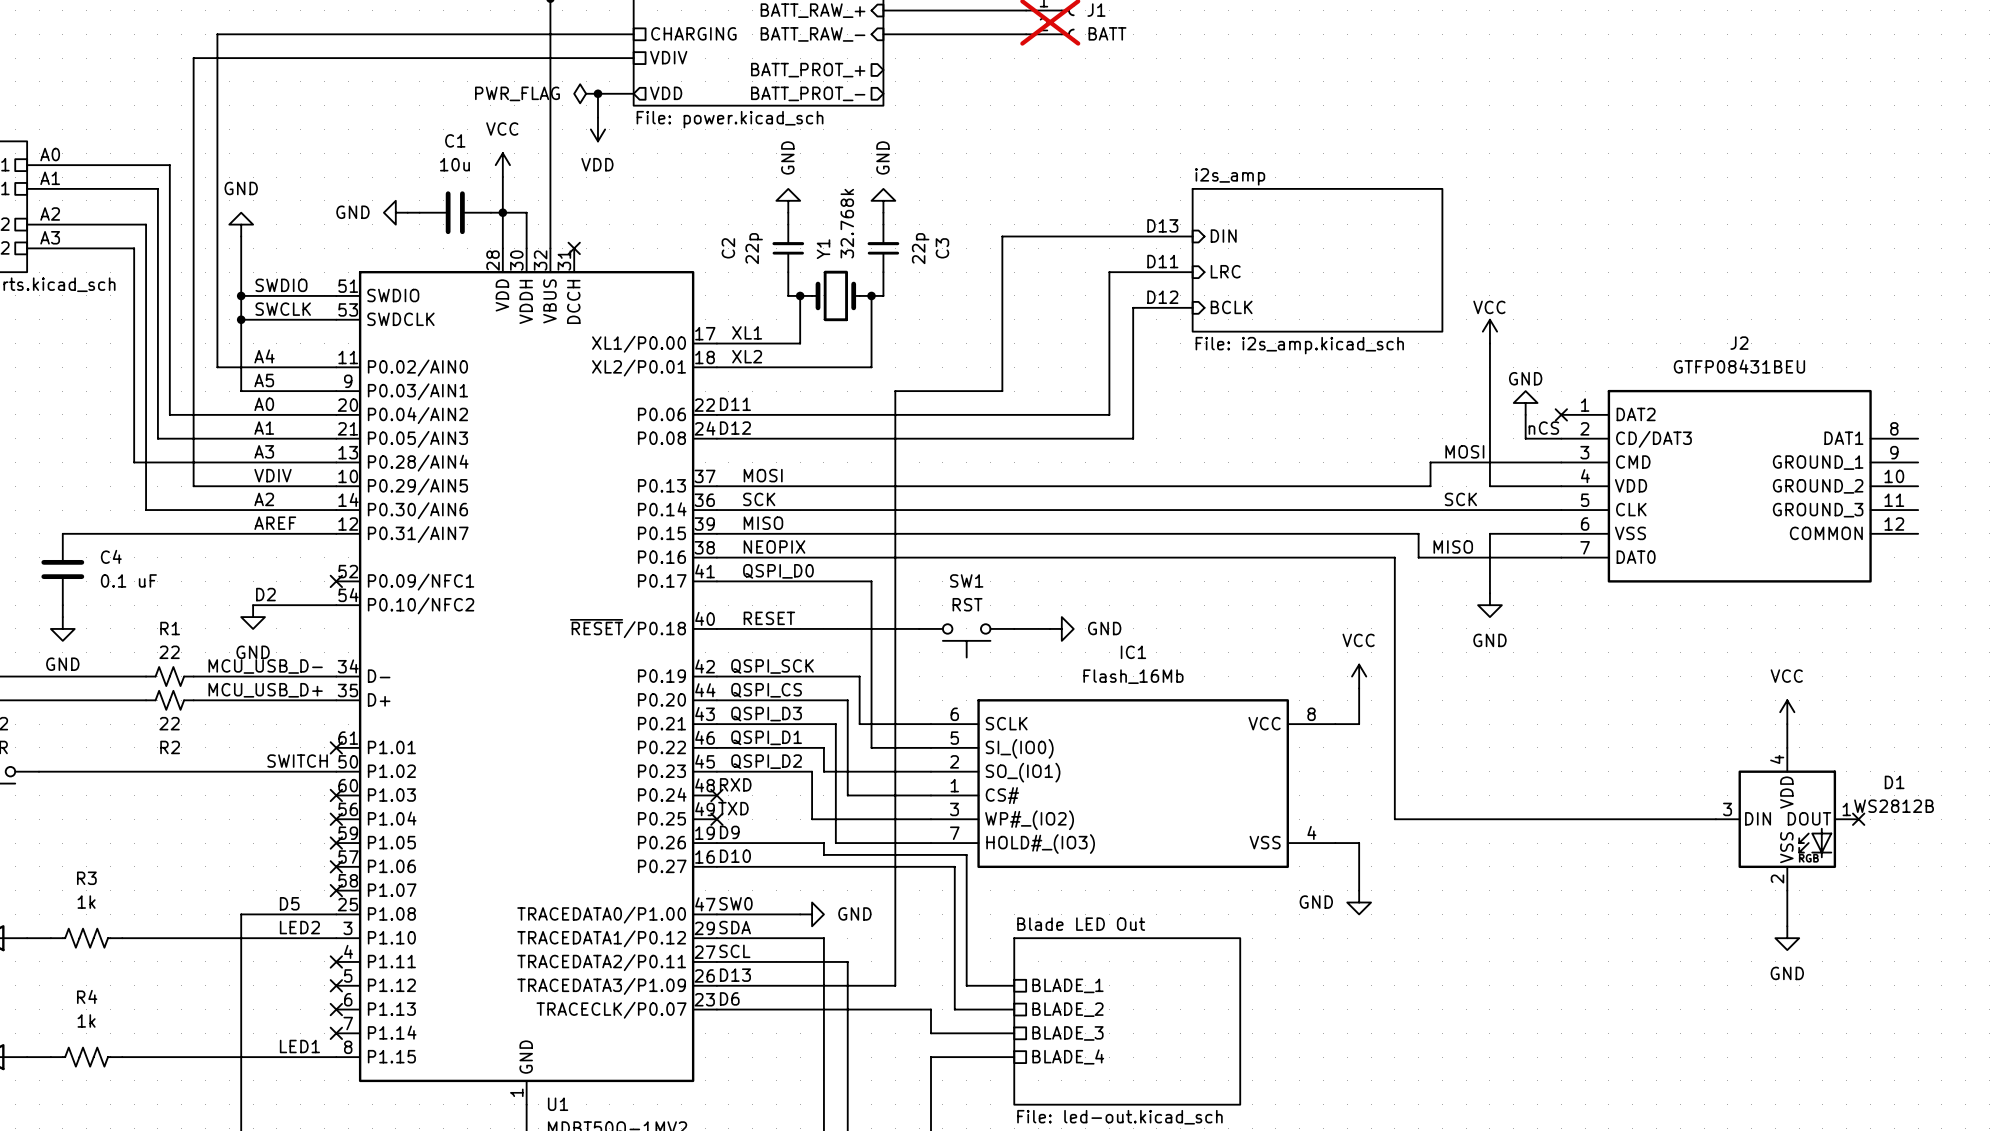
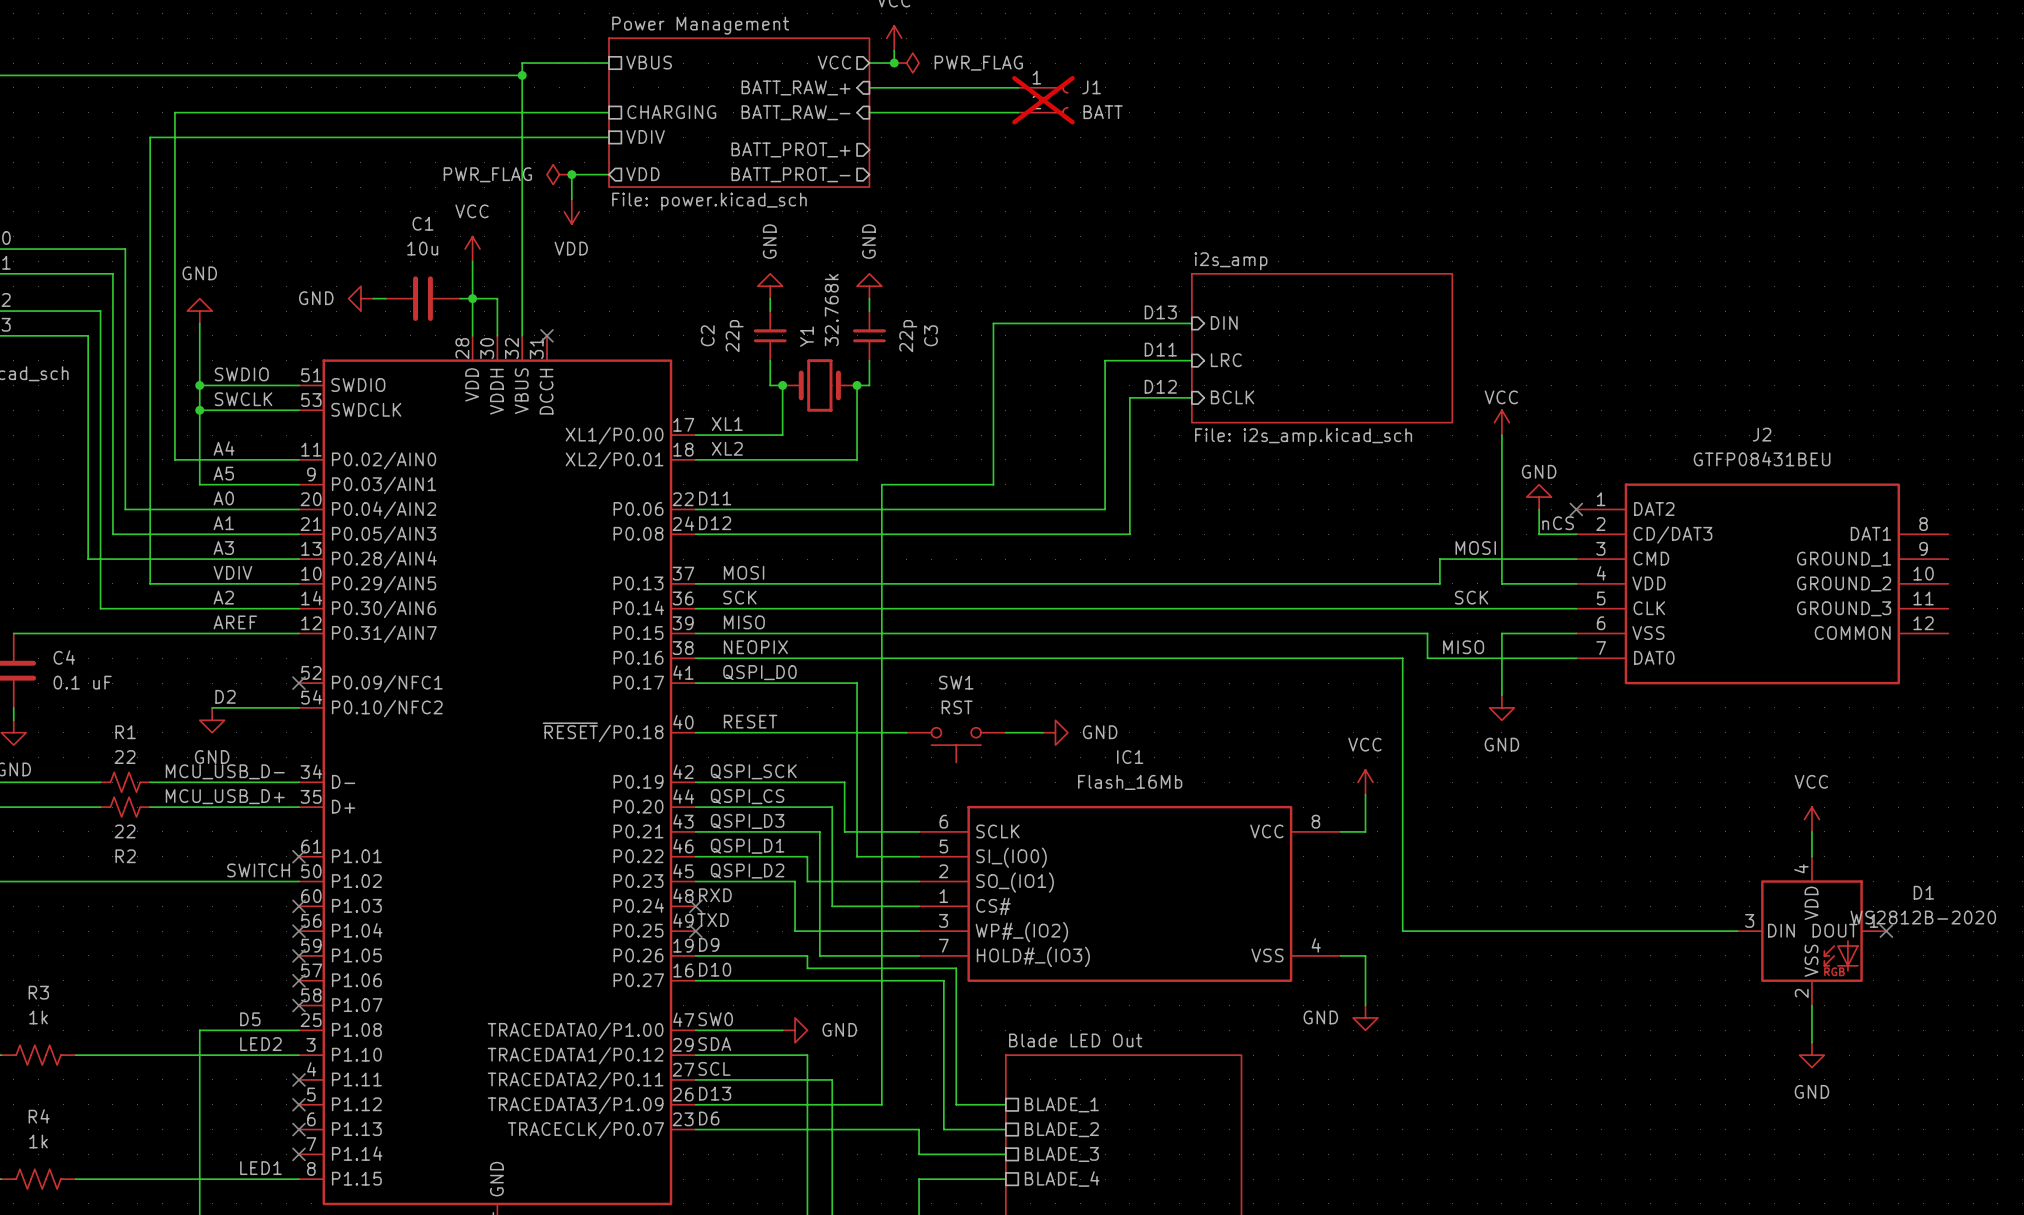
D1 value: WS2812B (1894, 806) -> WS2812B-2020 (1923, 917)

